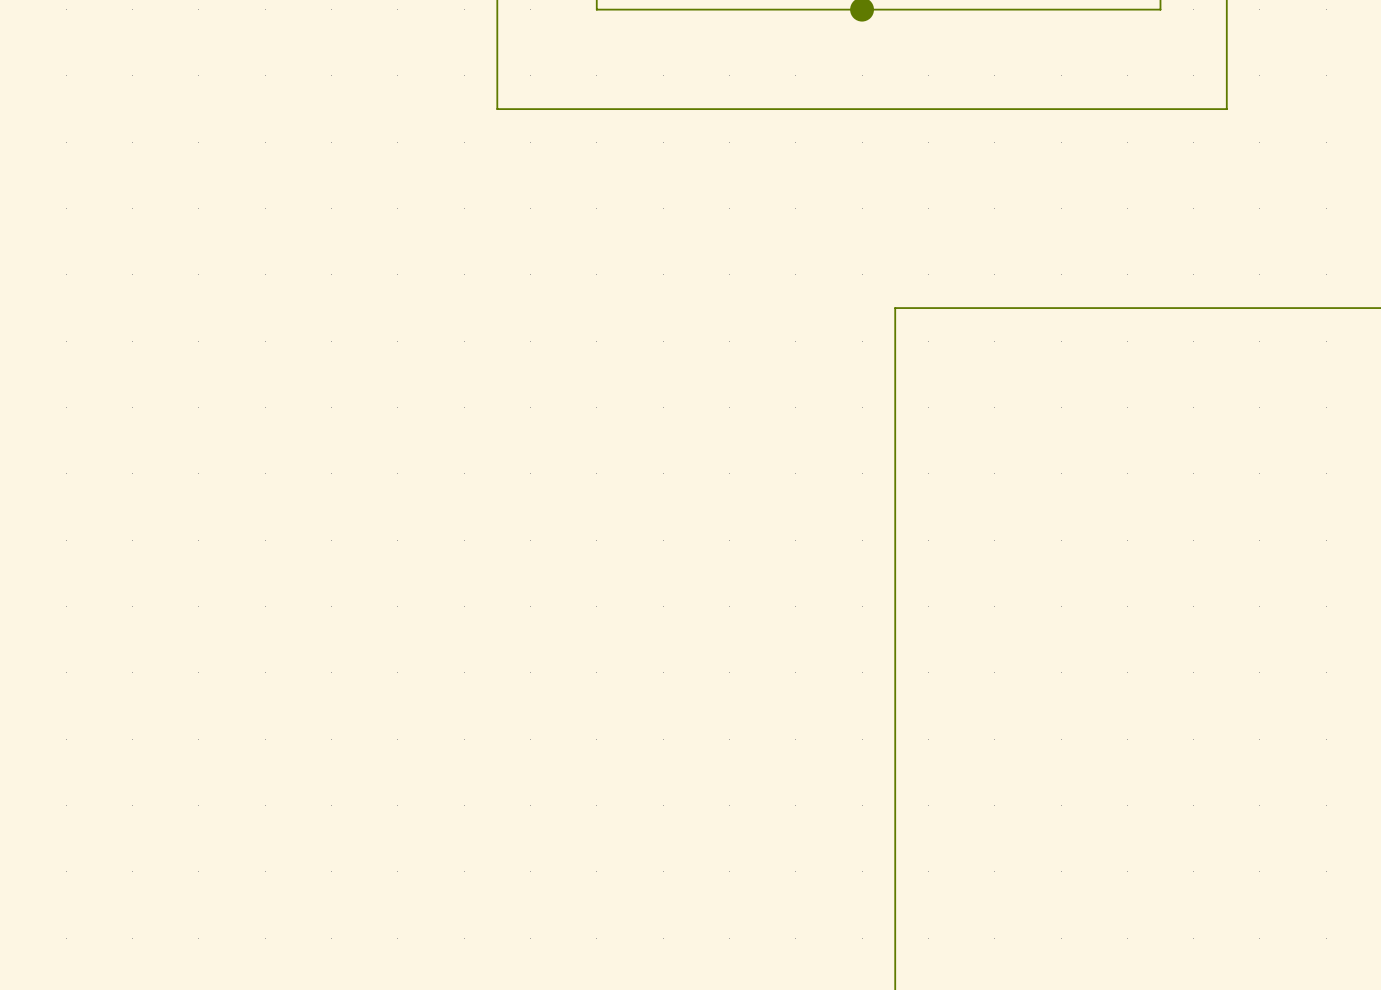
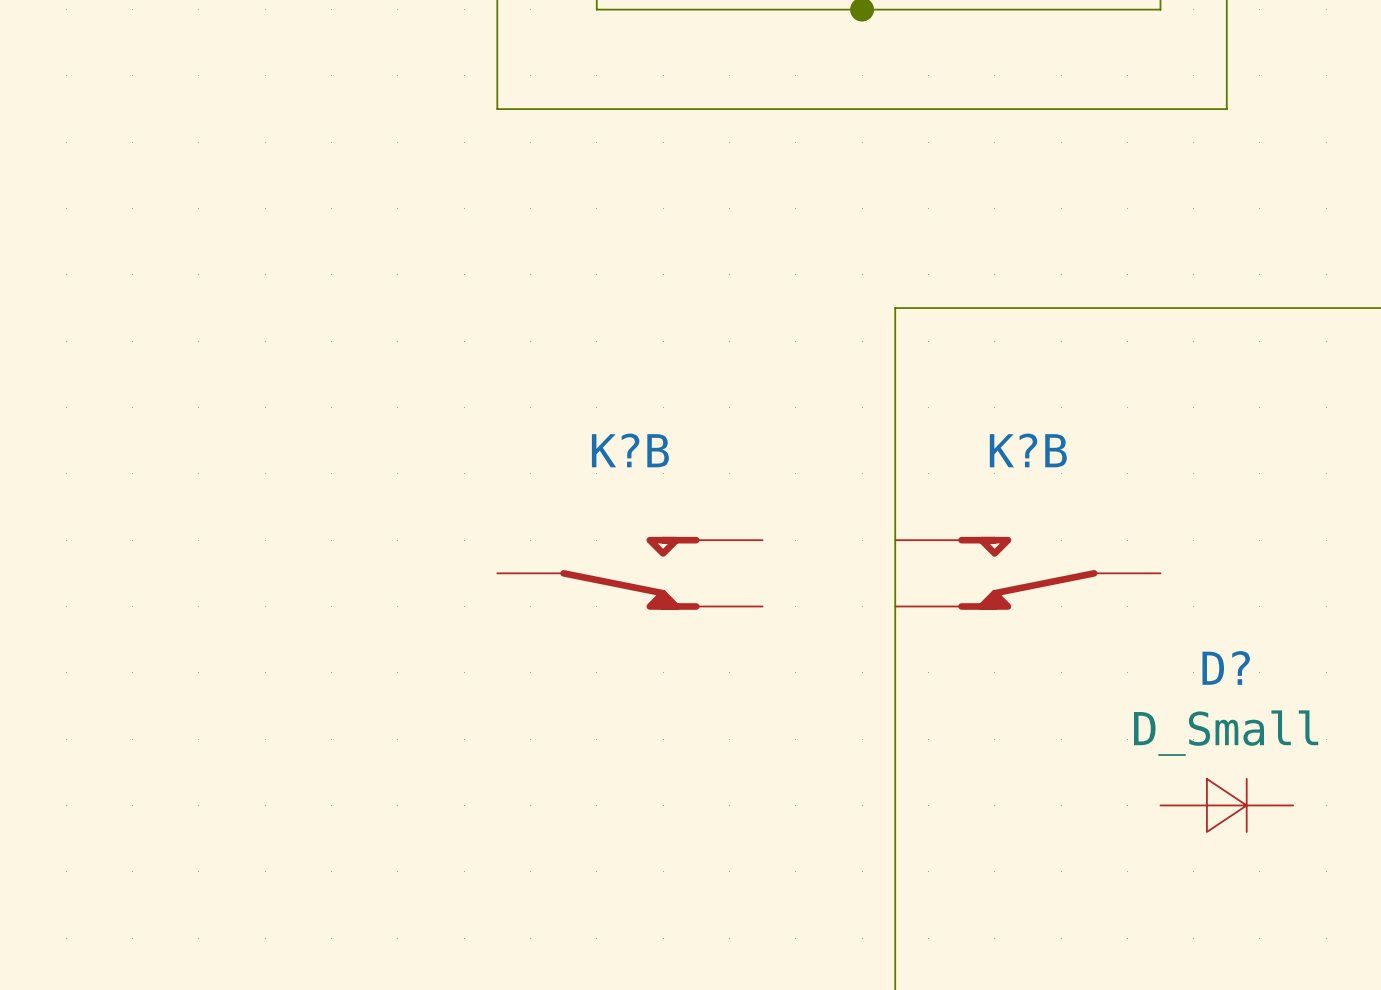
K?B: none -> (629, 573)
K?B: none -> (1027, 573)
D?: none -> D_Small (1226, 805)

